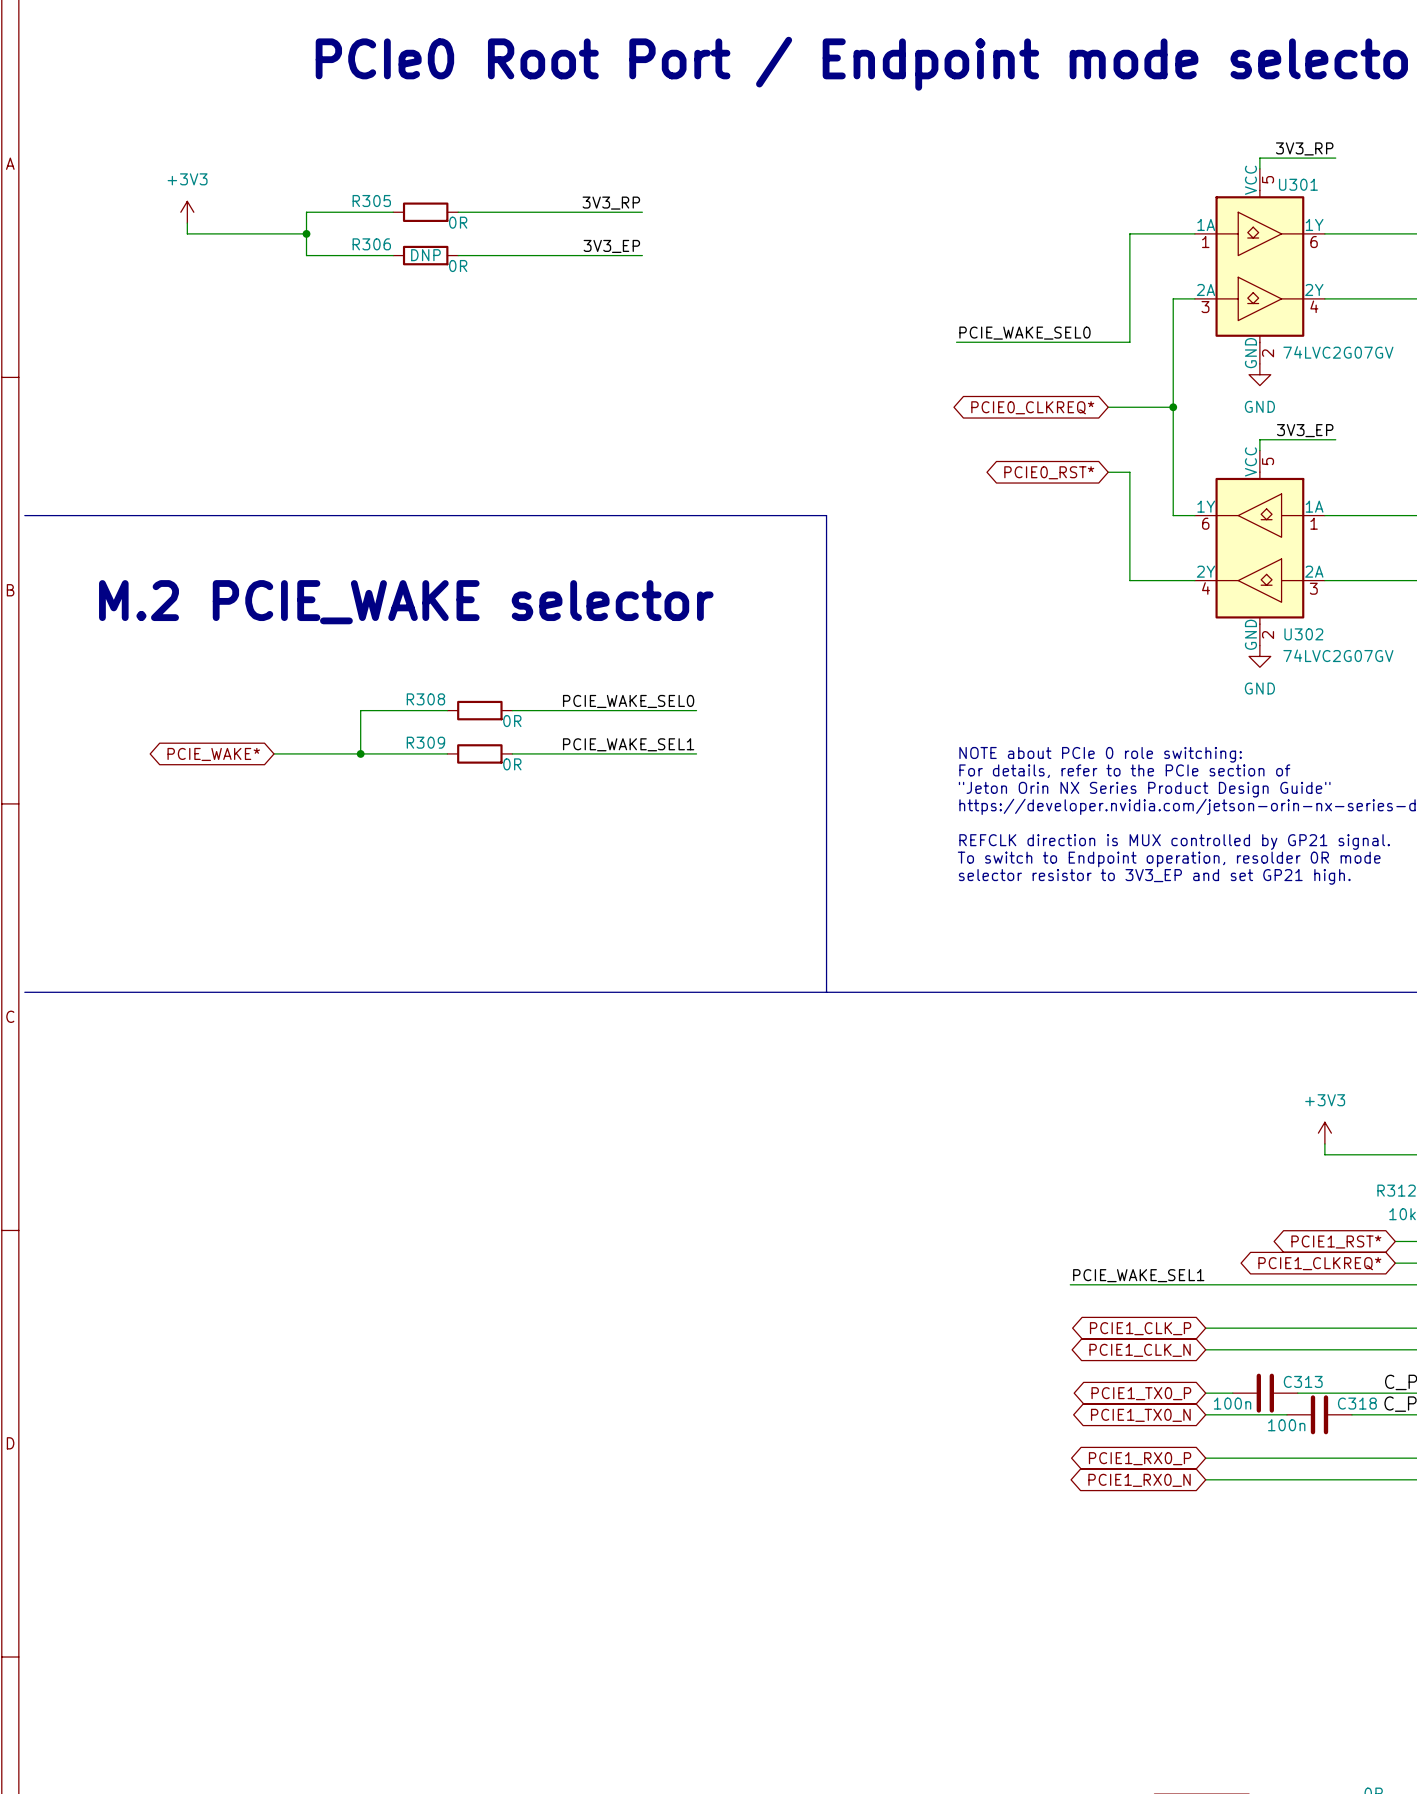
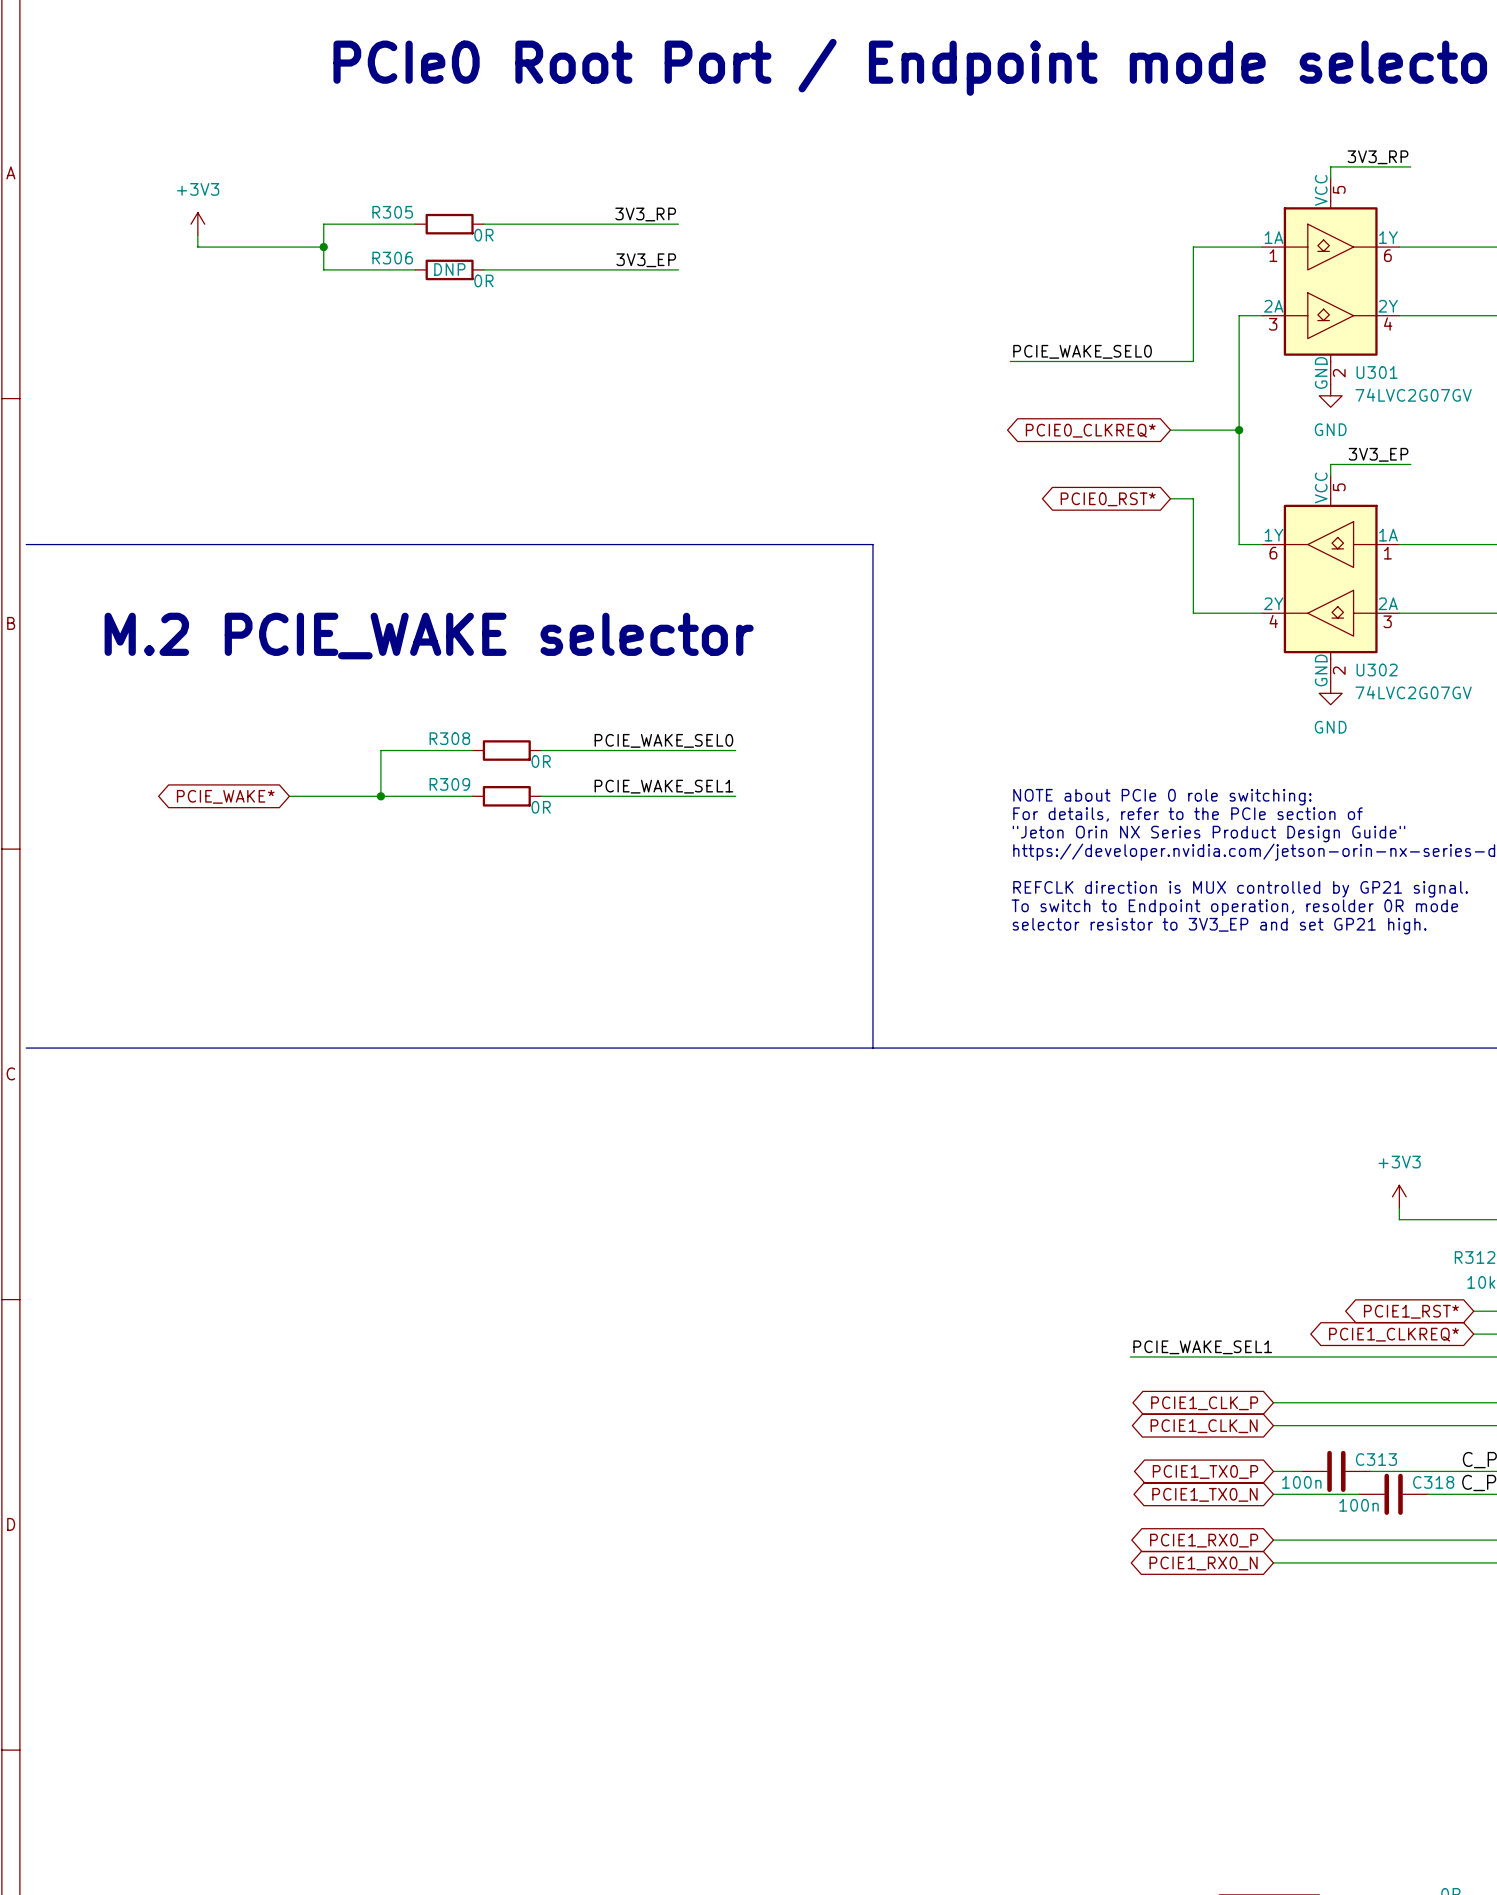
U301 name position: U301 (1298, 184) -> U301 (1377, 372)
U301 value position: 74LVC2G07GV (1338, 352) -> 74LVC2G07GV (1413, 395)

